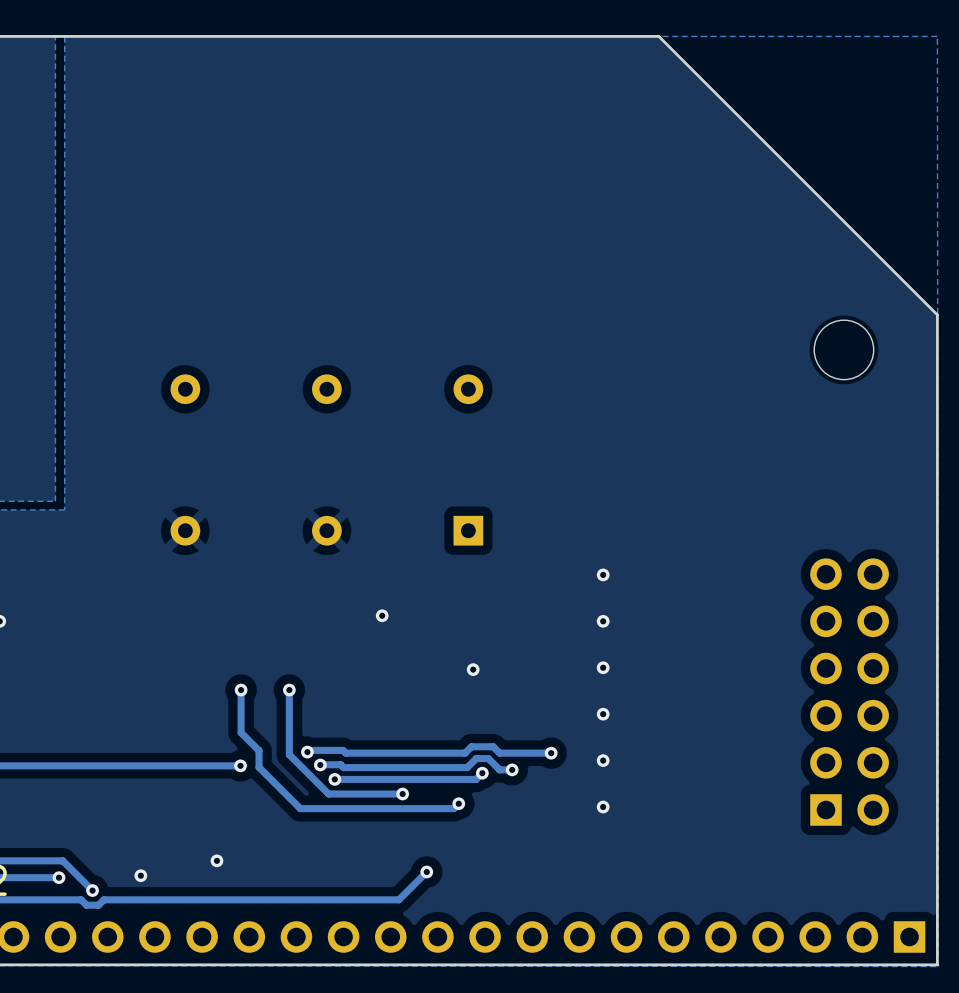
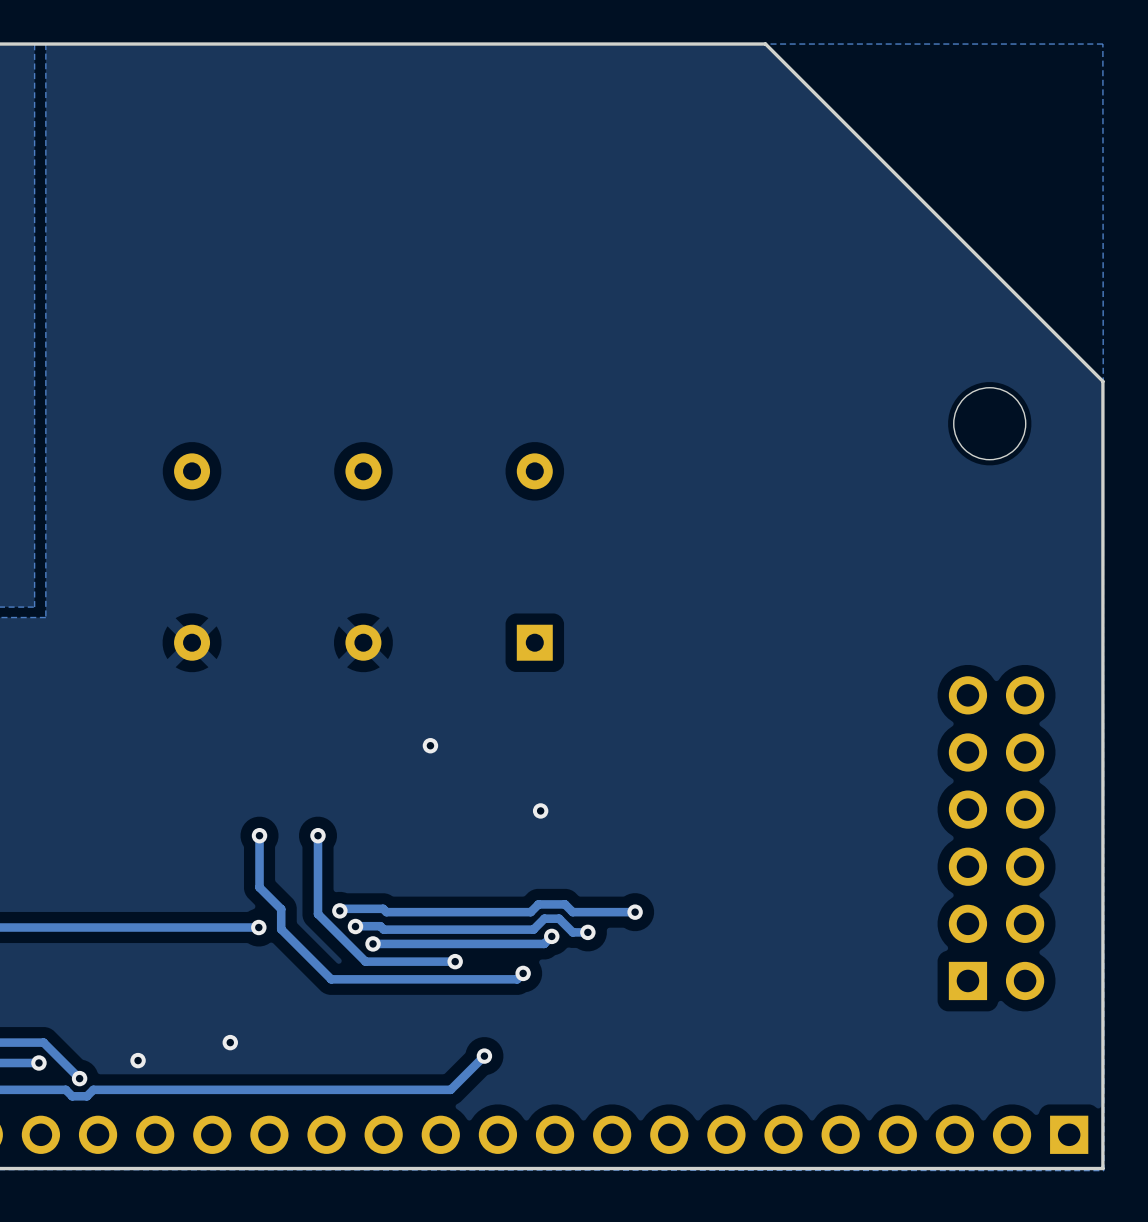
via: (603, 574) -> none
via: (603, 621) -> none
via: (603, 667) -> none
via: (603, 714) -> none
via: (603, 760) -> none
via: (603, 807) -> none

